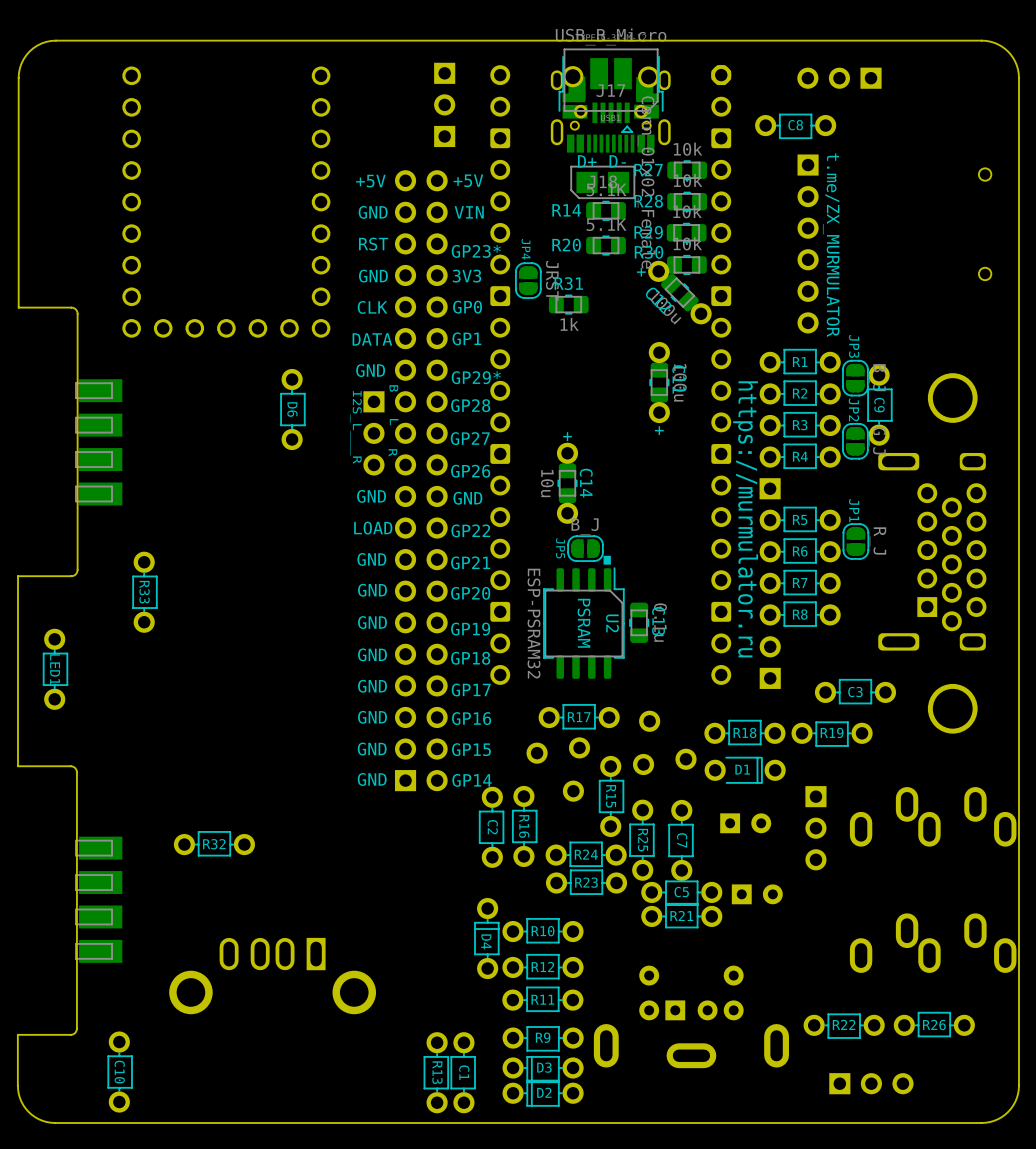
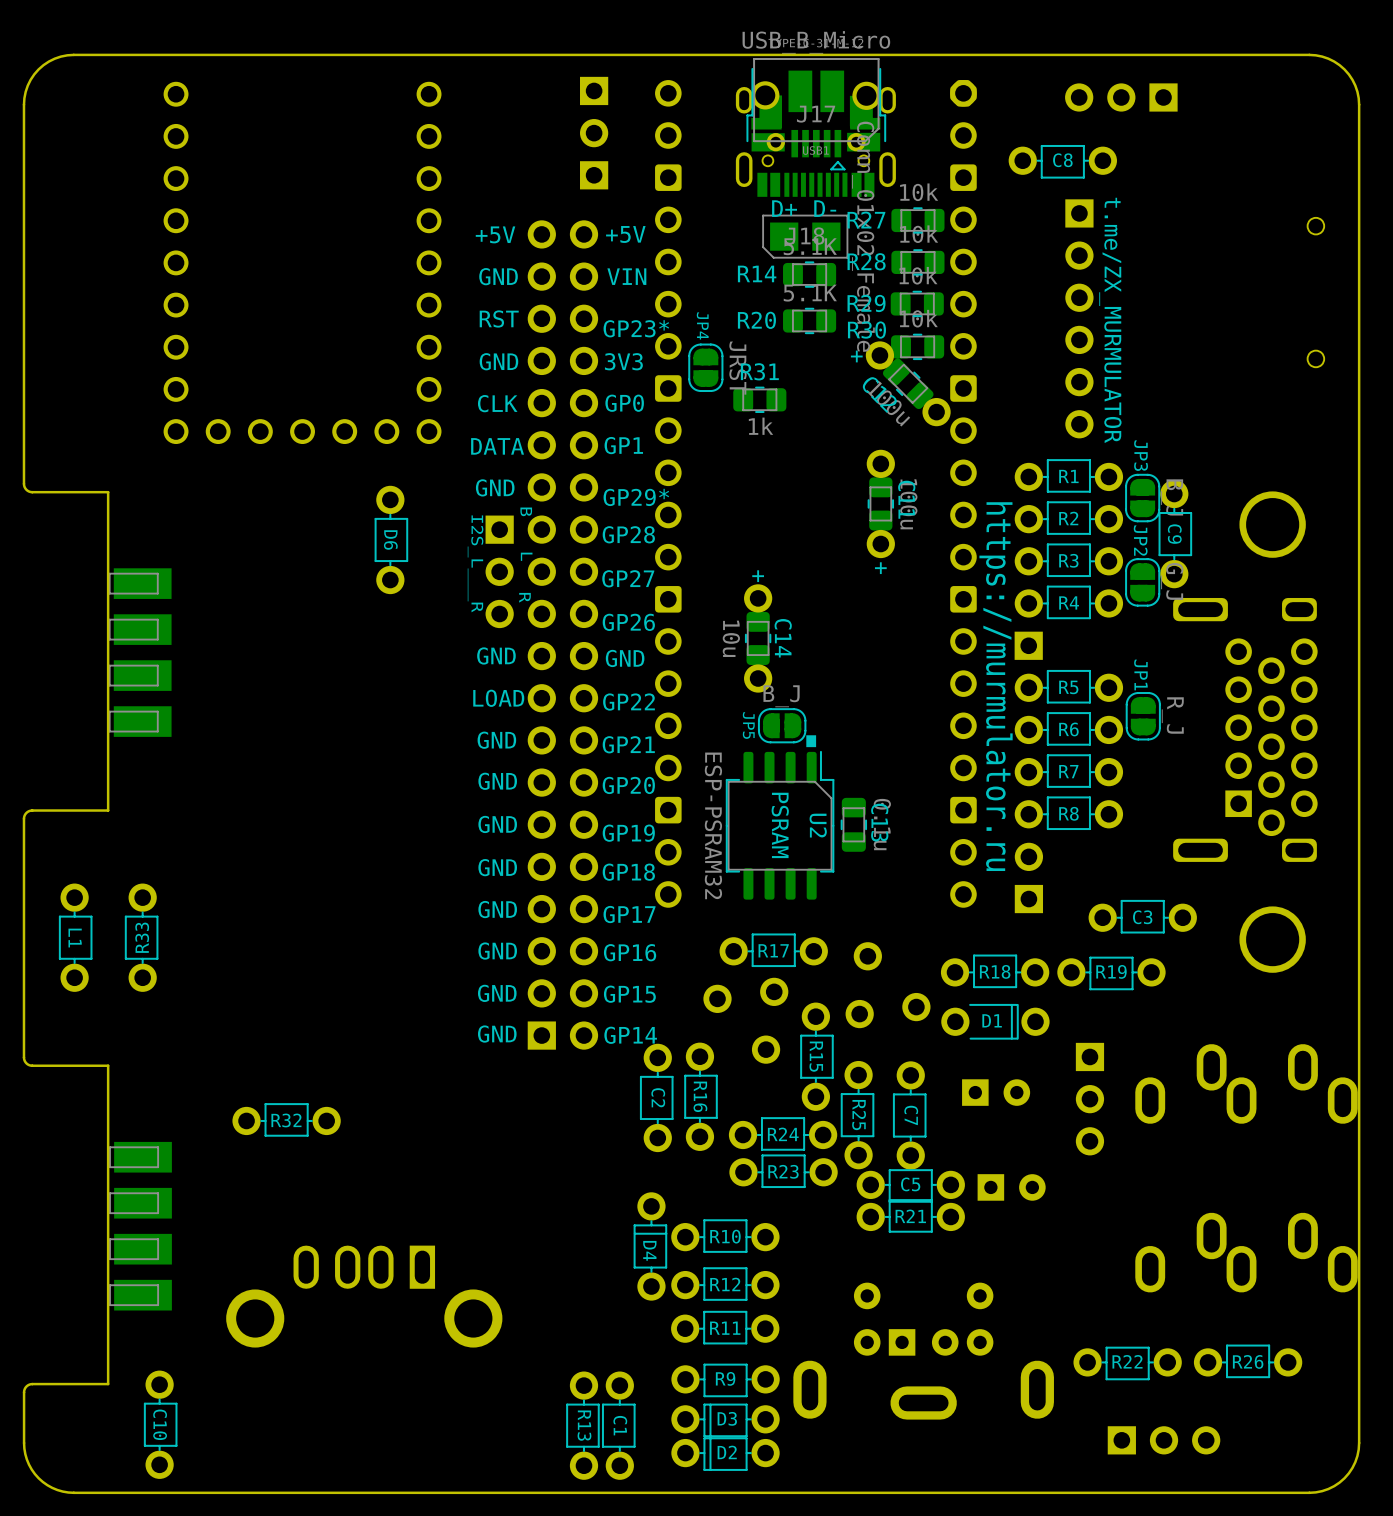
part position: (98, 442) -> (140, 652)
R33 rotation: 0° (144, 592) -> 180° (141, 937)
R33 position: (144, 592) -> (141, 937)
LED1: (55, 669) -> none
L1: none -> (75, 937)
part position: (98, 899) -> (140, 1226)
board edge: (17, 1047) (17, 1034) (71, 1034) (75, 1033) (76, 1028) (76, 770) (71, 766) (18, 766) (18, 576) (72, 576) (75, 574) (77, 569) (77, 312) (72, 307) (18, 307) (18, 77) (21, 63) (29, 51) (41, 43) (55, 40) (985, 40) (997, 44) (1008, 51) (1016, 65) (1018, 77) (1018, 1085) (1016, 1098) (1008, 1112) (994, 1120) (980, 1122) -> (24, 1392) (25, 1387) (31, 1384) (108, 1384) (108, 1065) (31, 1065) (25, 1062) (23, 1057) (24, 815) (32, 810) (108, 810) (108, 492) (31, 492) (26, 489) (24, 484) (23, 104) (27, 85) (38, 69) (54, 58) (73, 54) (1315, 55) (1334, 61) (1348, 74) (1357, 91) (1359, 104) (1359, 1443) (1355, 1462) (1344, 1478) (1328, 1489) (1309, 1492)

